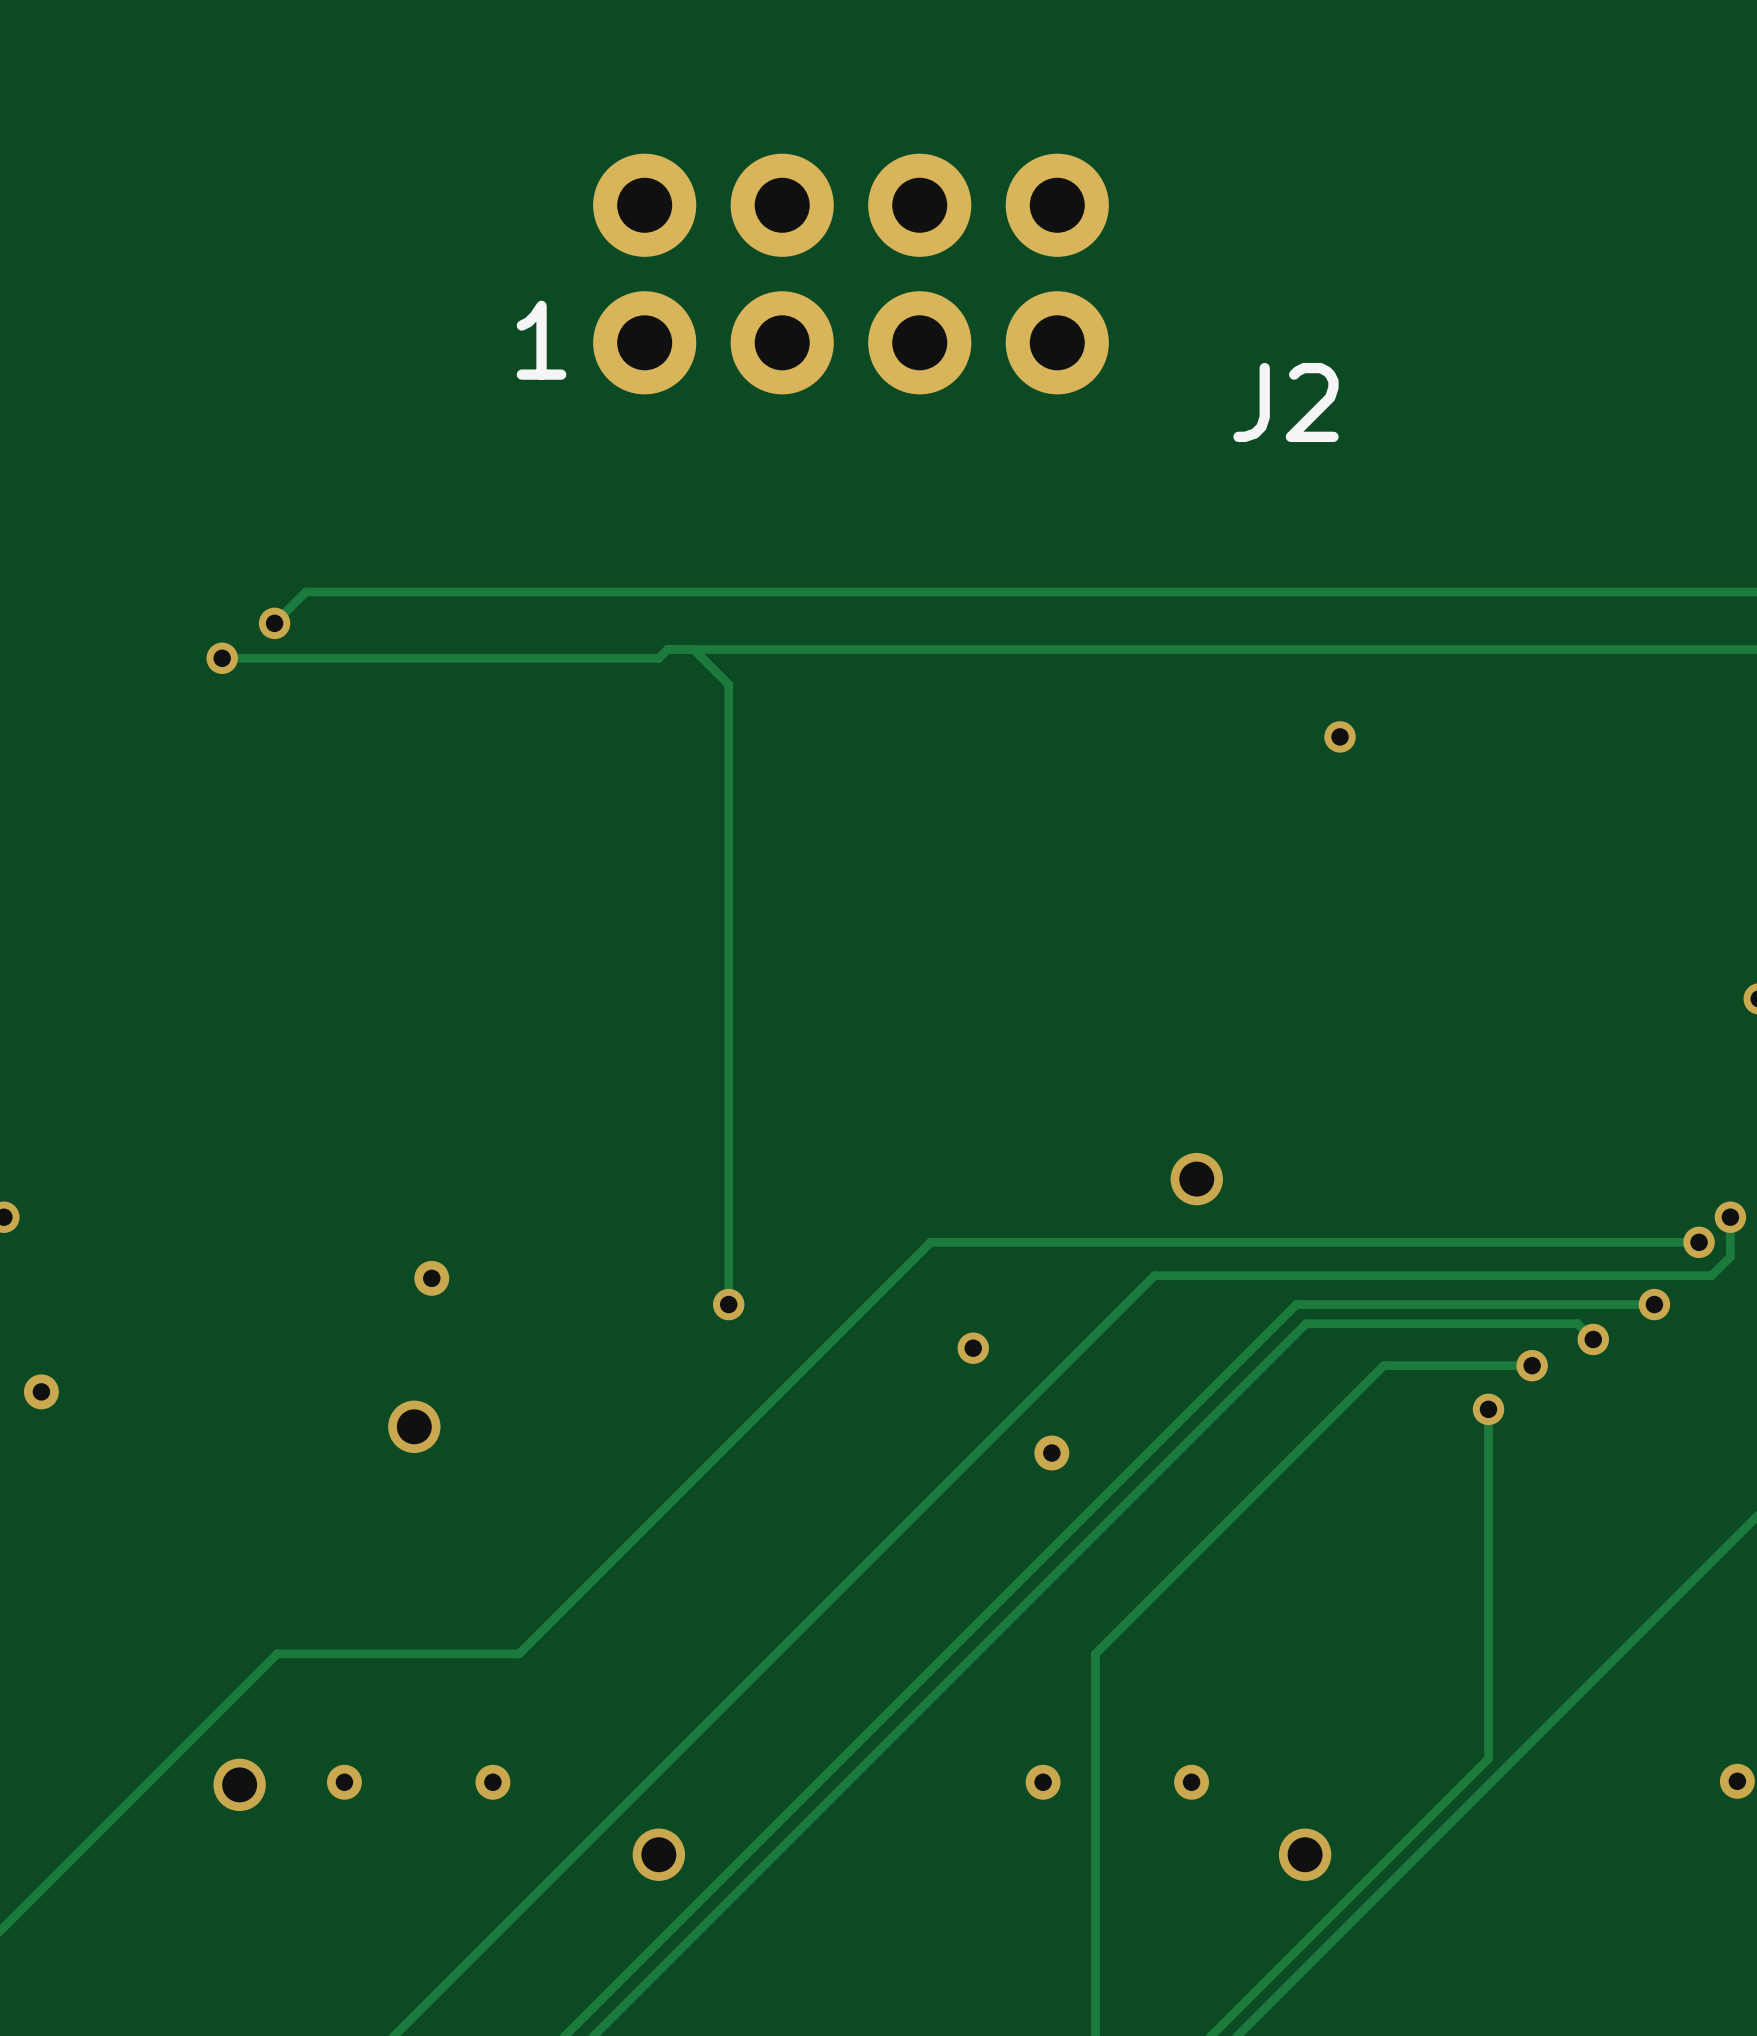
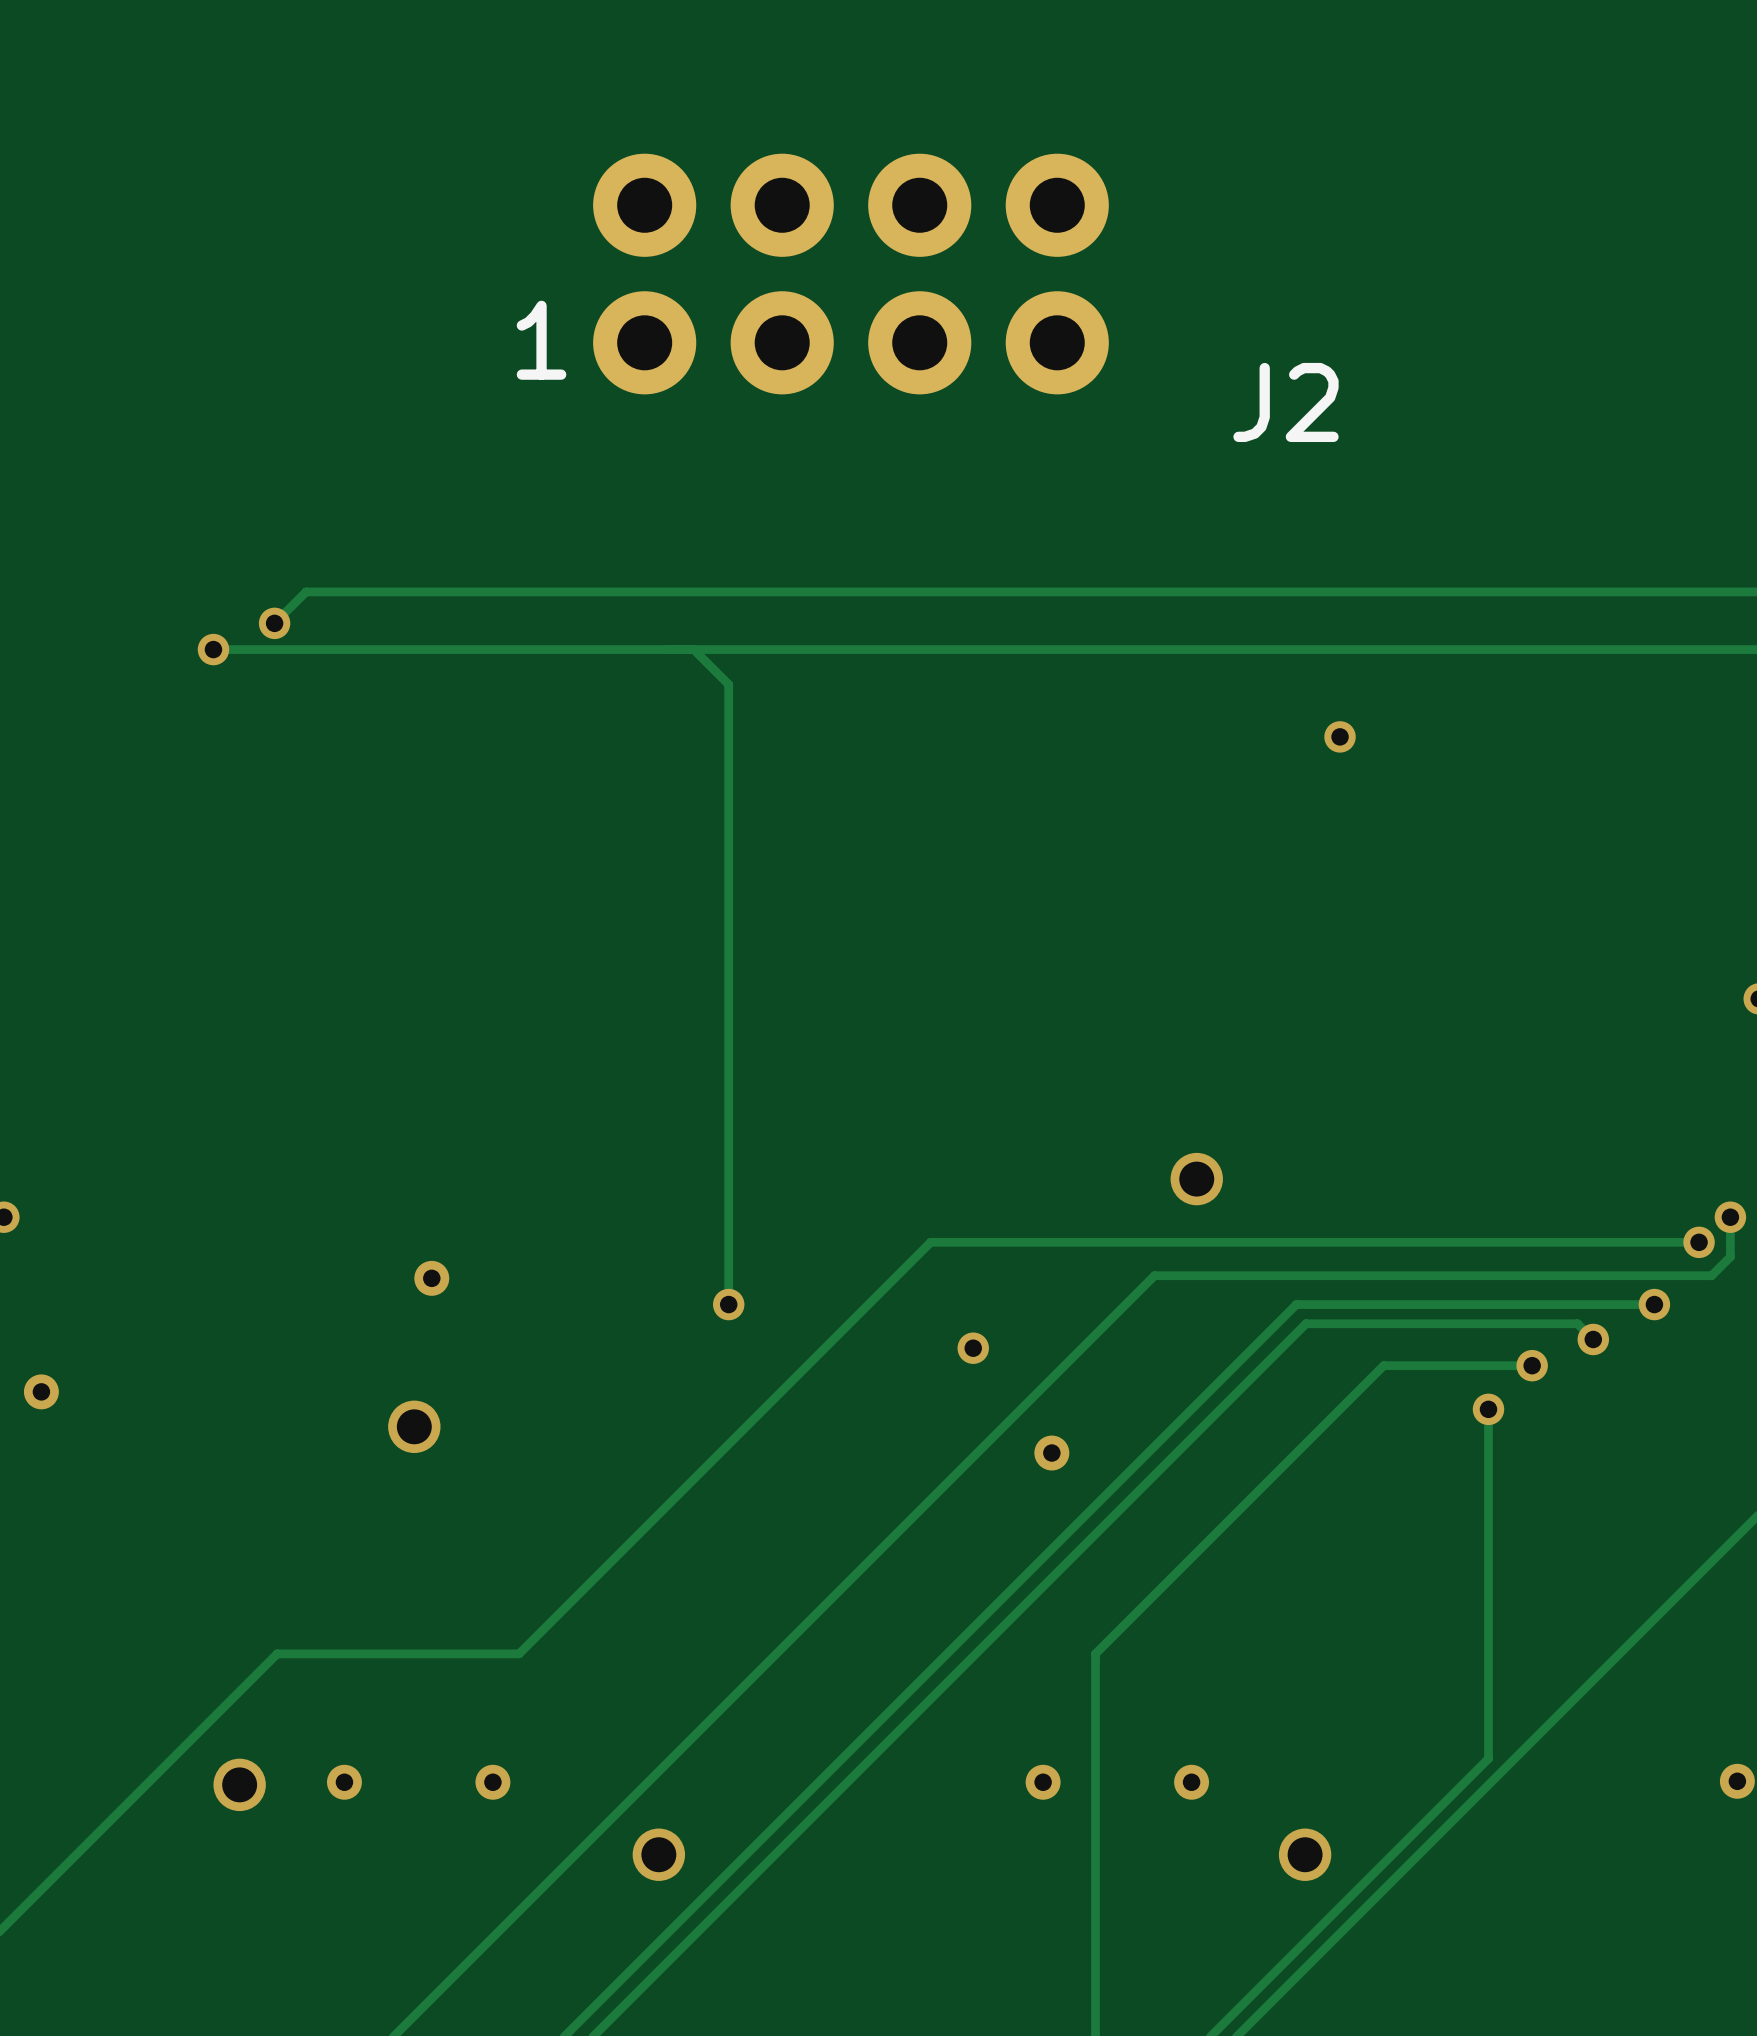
track: (667, 649) (658, 658) (222, 658) -> (667, 649) (213, 649)
via position: (222, 658) -> (213, 649)

